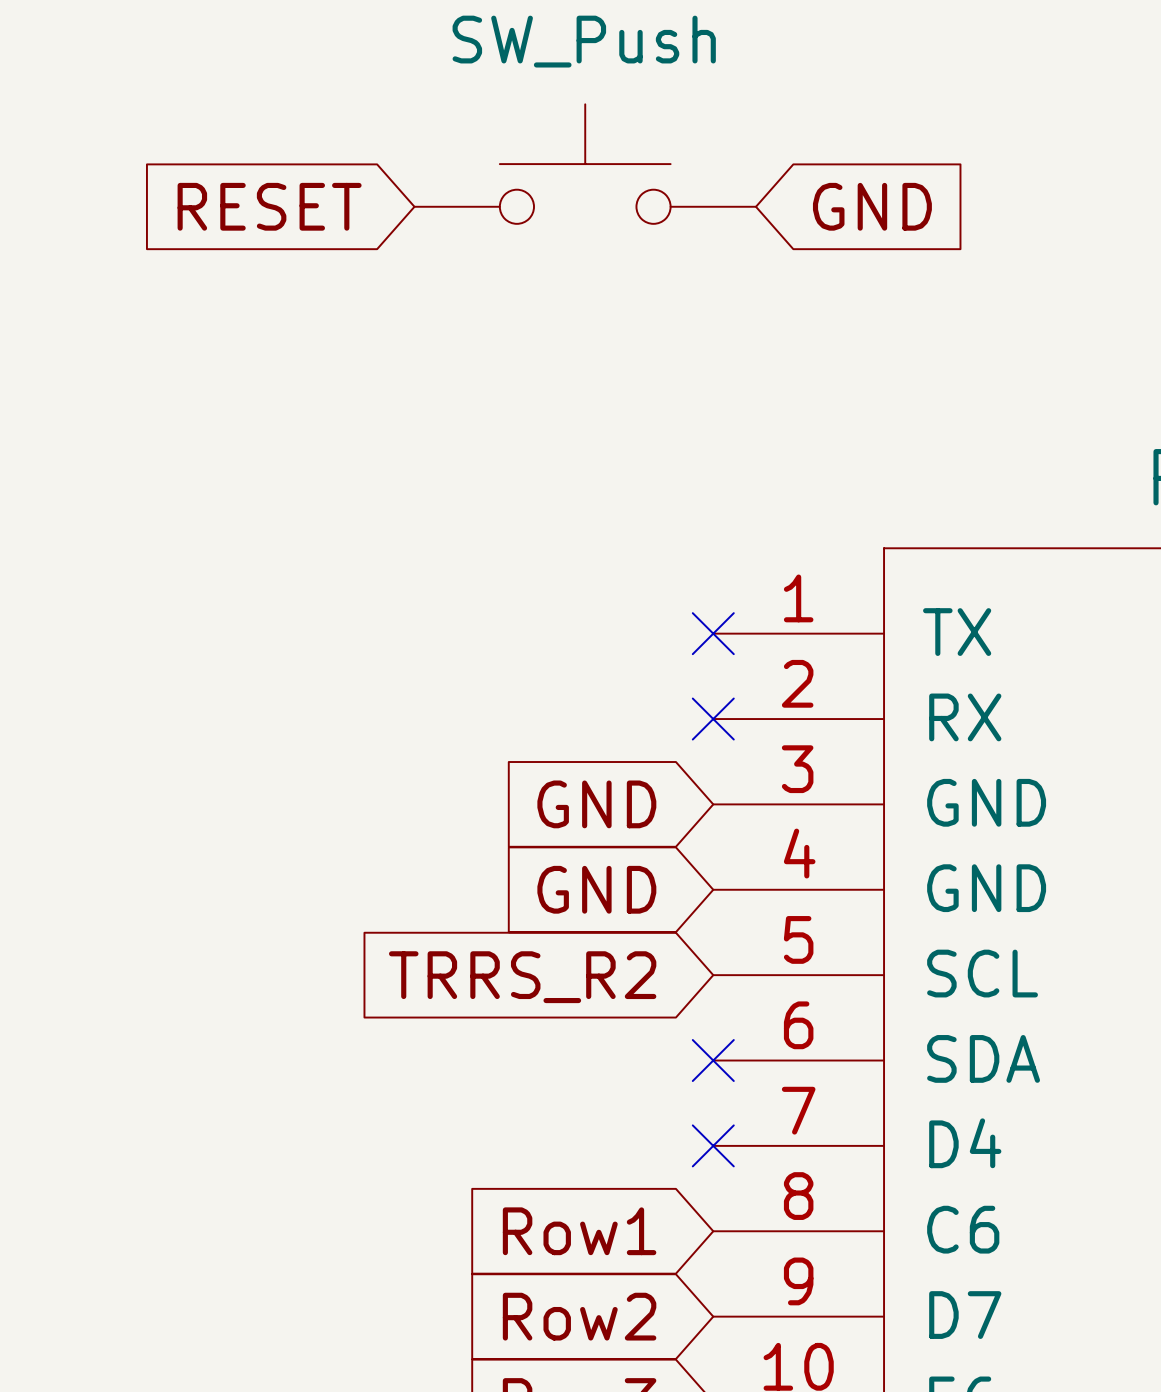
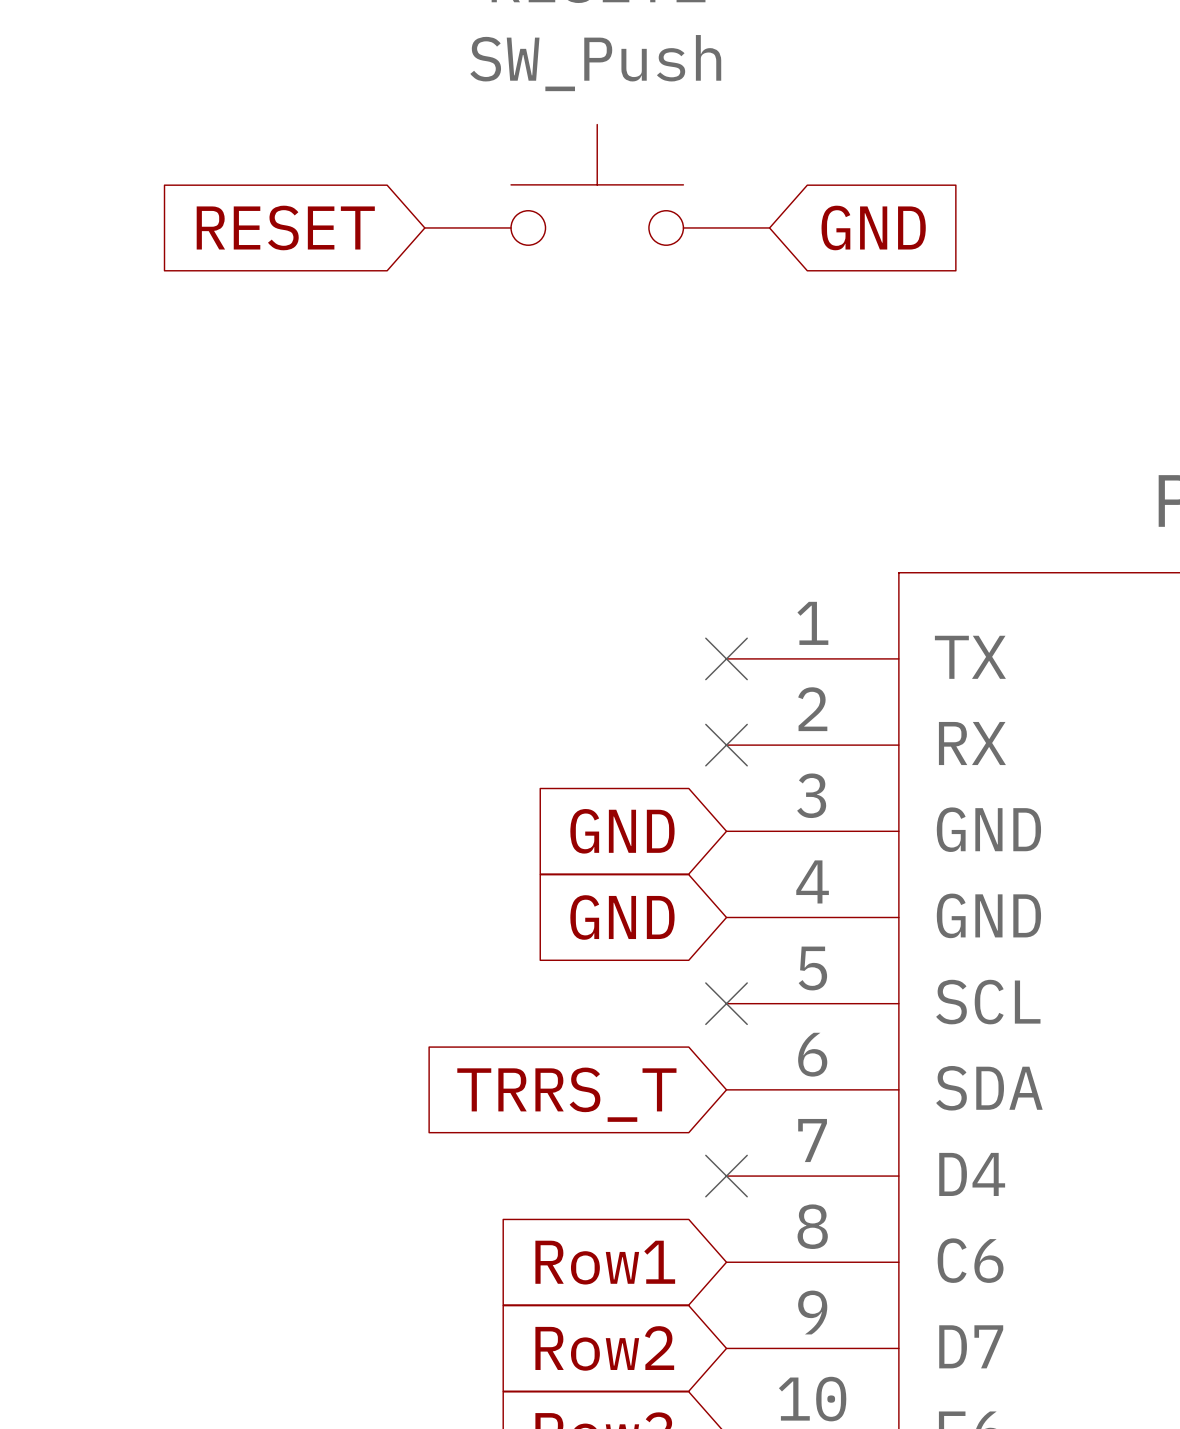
global label: TRRS_R2 (522, 977) -> TRRS_T (566, 1094)
no-connect mark position: (713, 1060) -> (726, 1003)

